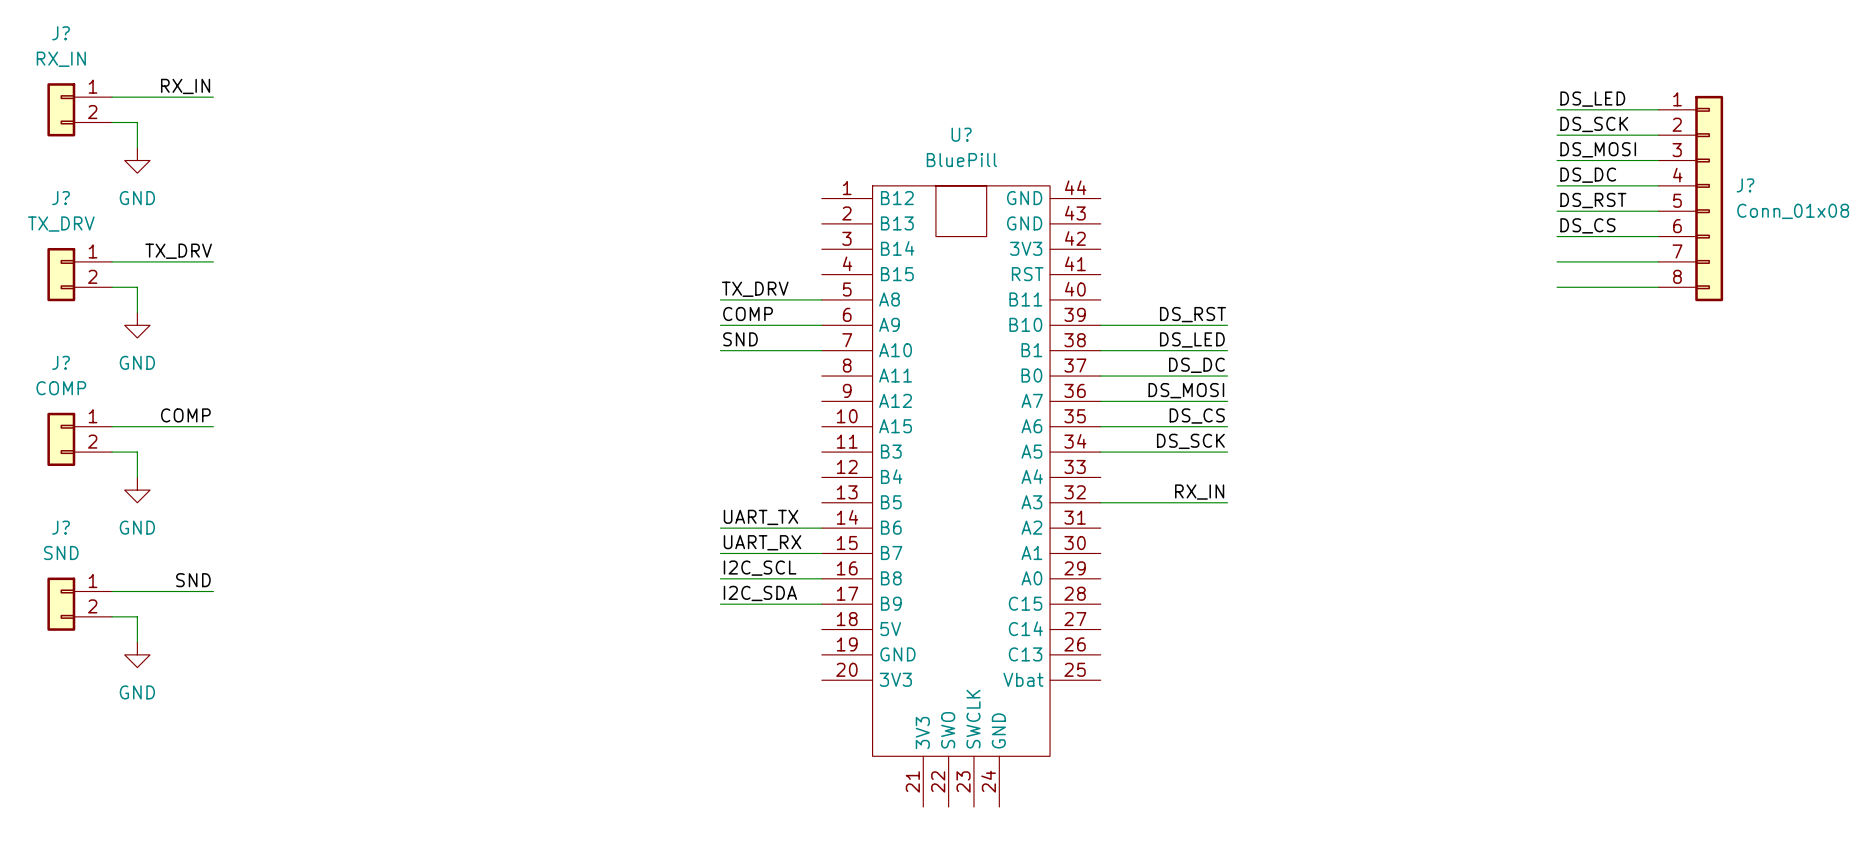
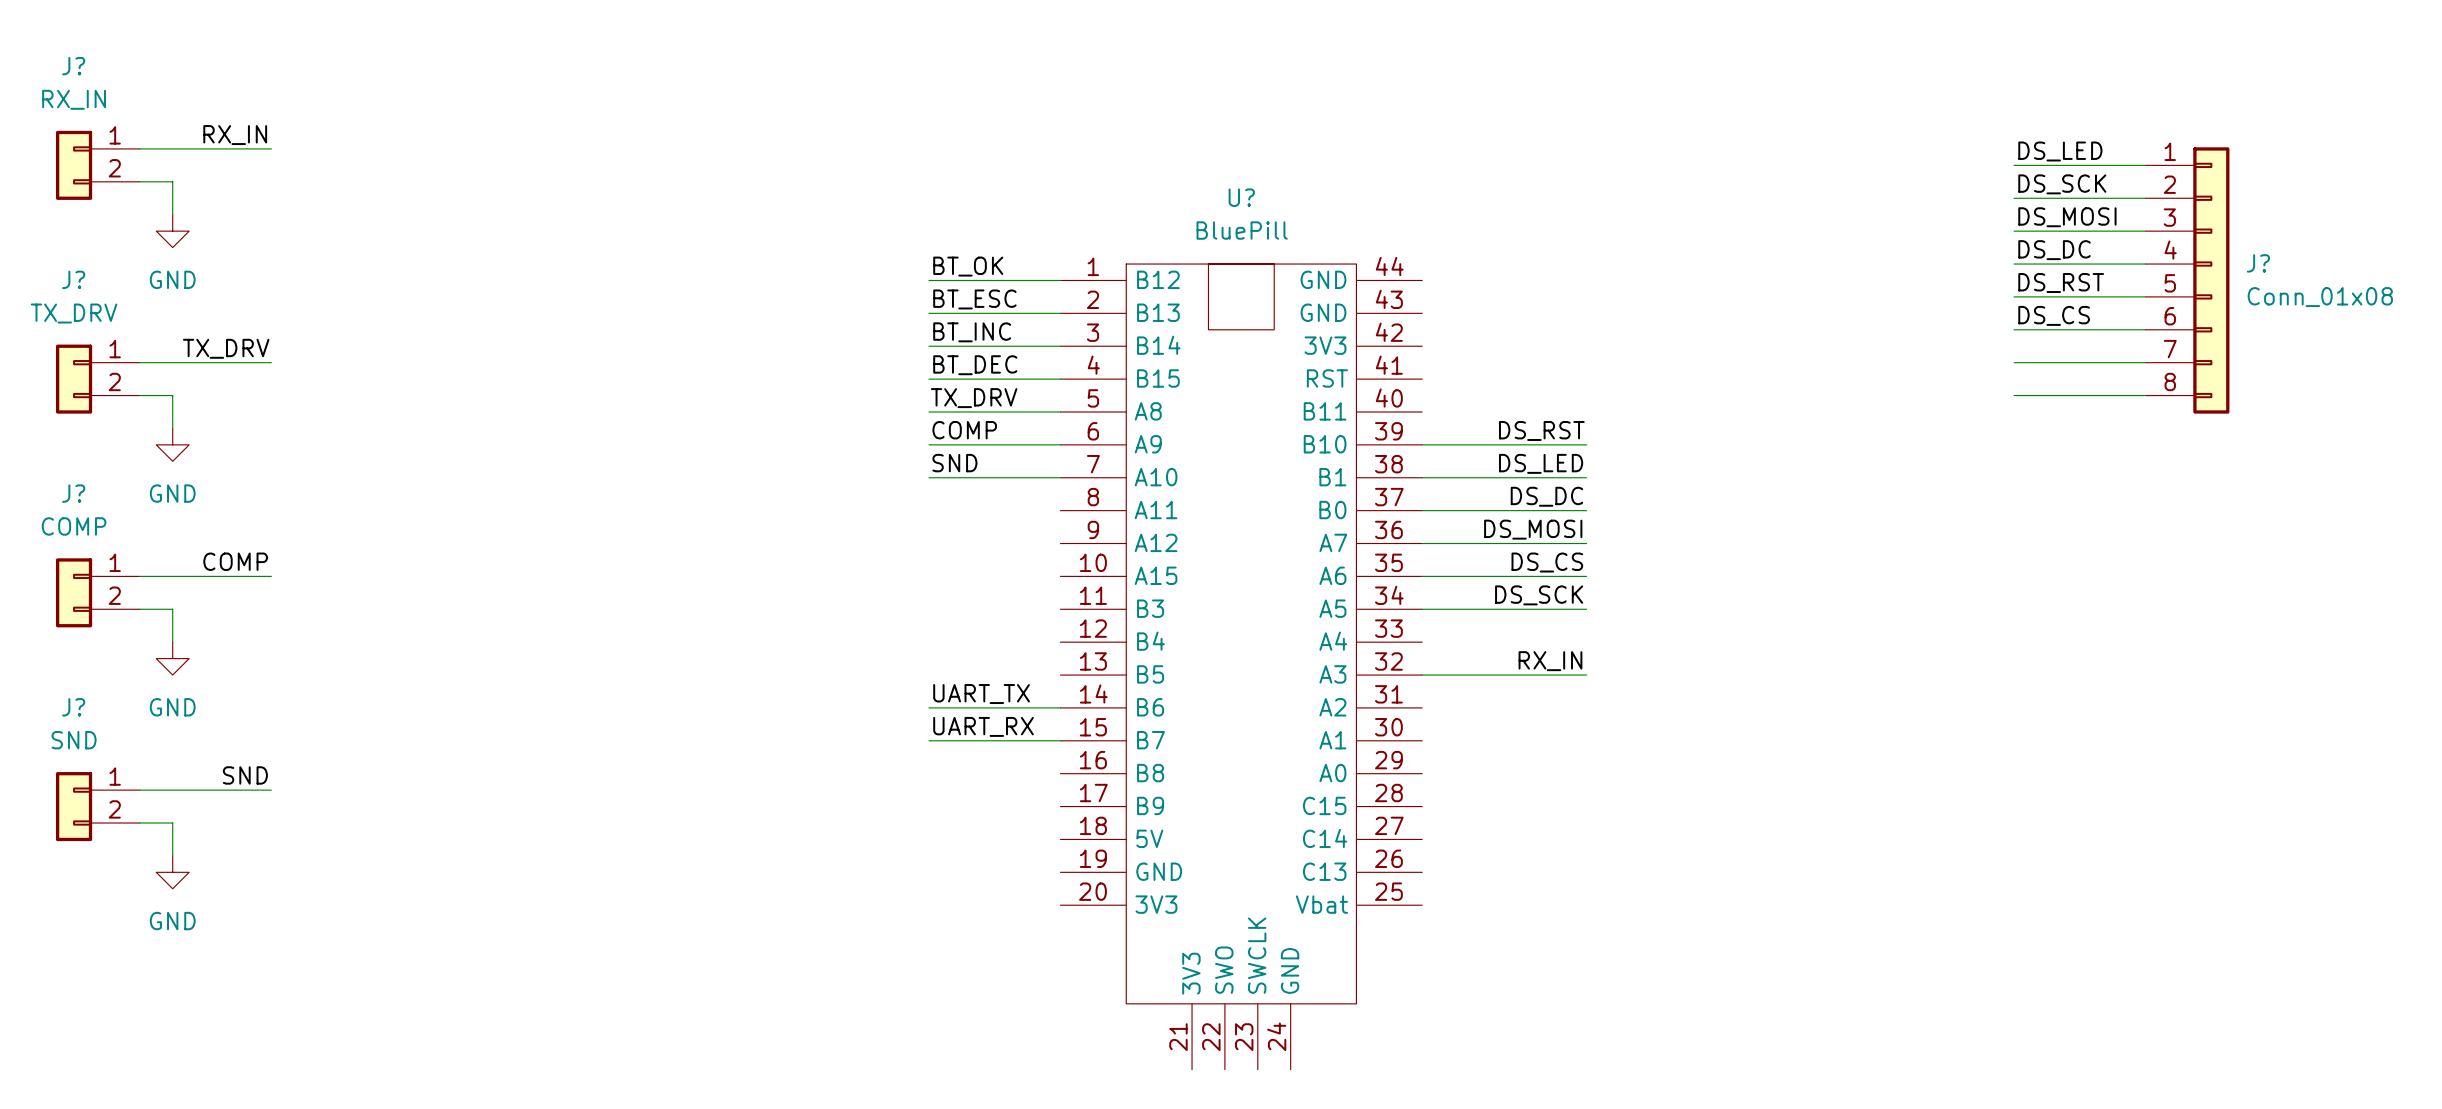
label: none -> BT_OK (968, 266)
wire: none -> (928, 280) (1060, 280)
label: none -> BT_ESC (974, 299)
wire: none -> (928, 313) (1060, 313)
label: none -> BT_INC (972, 332)
wire: none -> (928, 346) (1060, 346)
label: none -> BT_DEC (975, 365)
wire: none -> (928, 379) (1060, 379)
label: I2C_SCL (760, 568) -> none
wire: (720, 578) (821, 578) -> none
label: I2C_SDA (760, 593) -> none
wire: (720, 604) (821, 604) -> none

